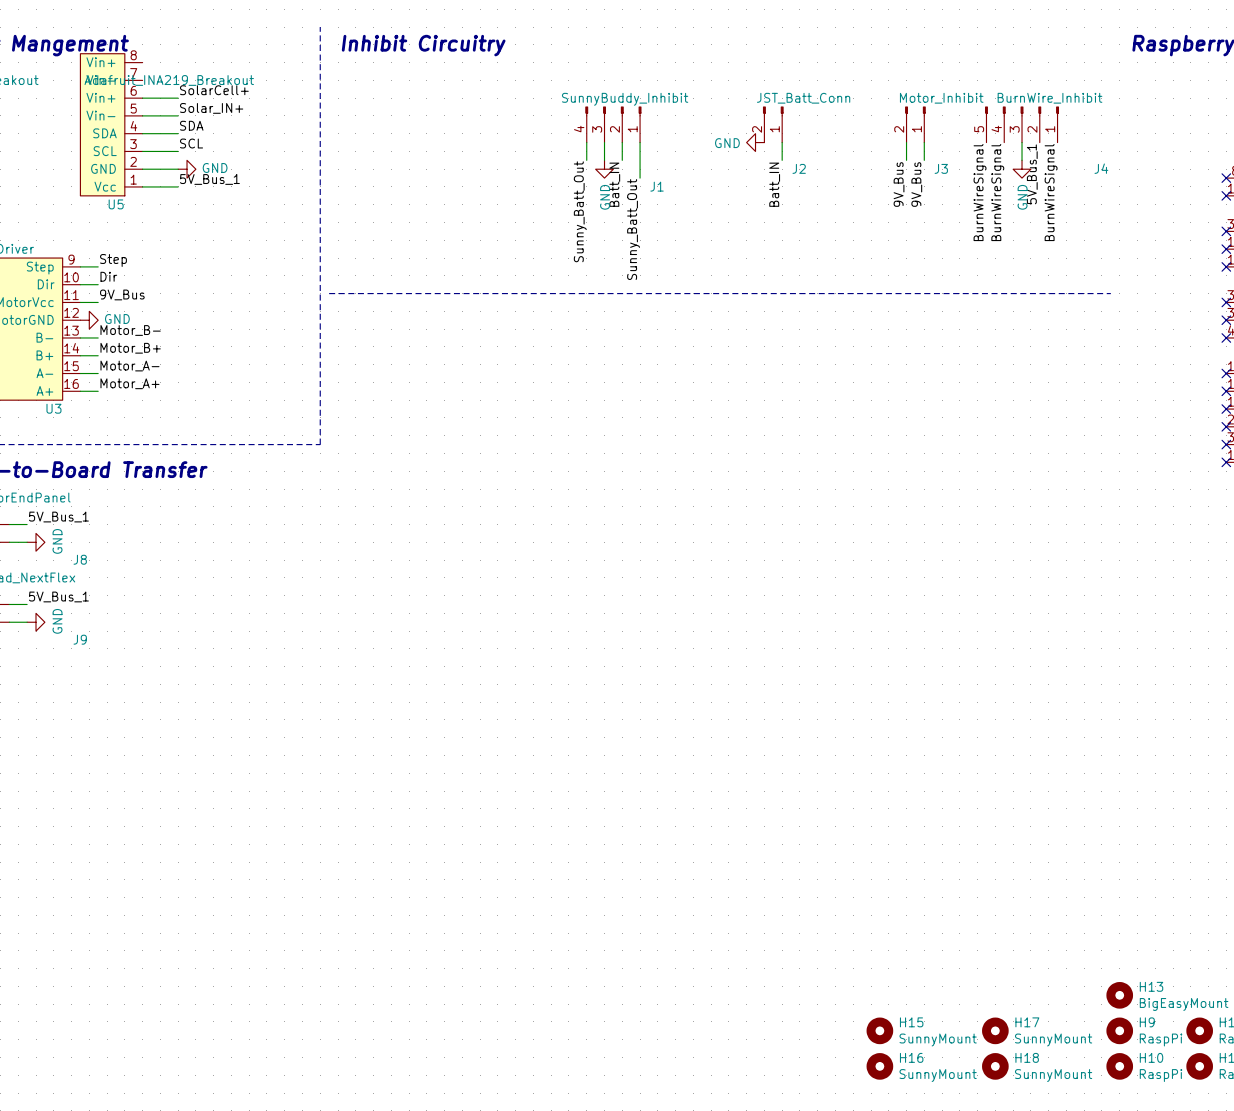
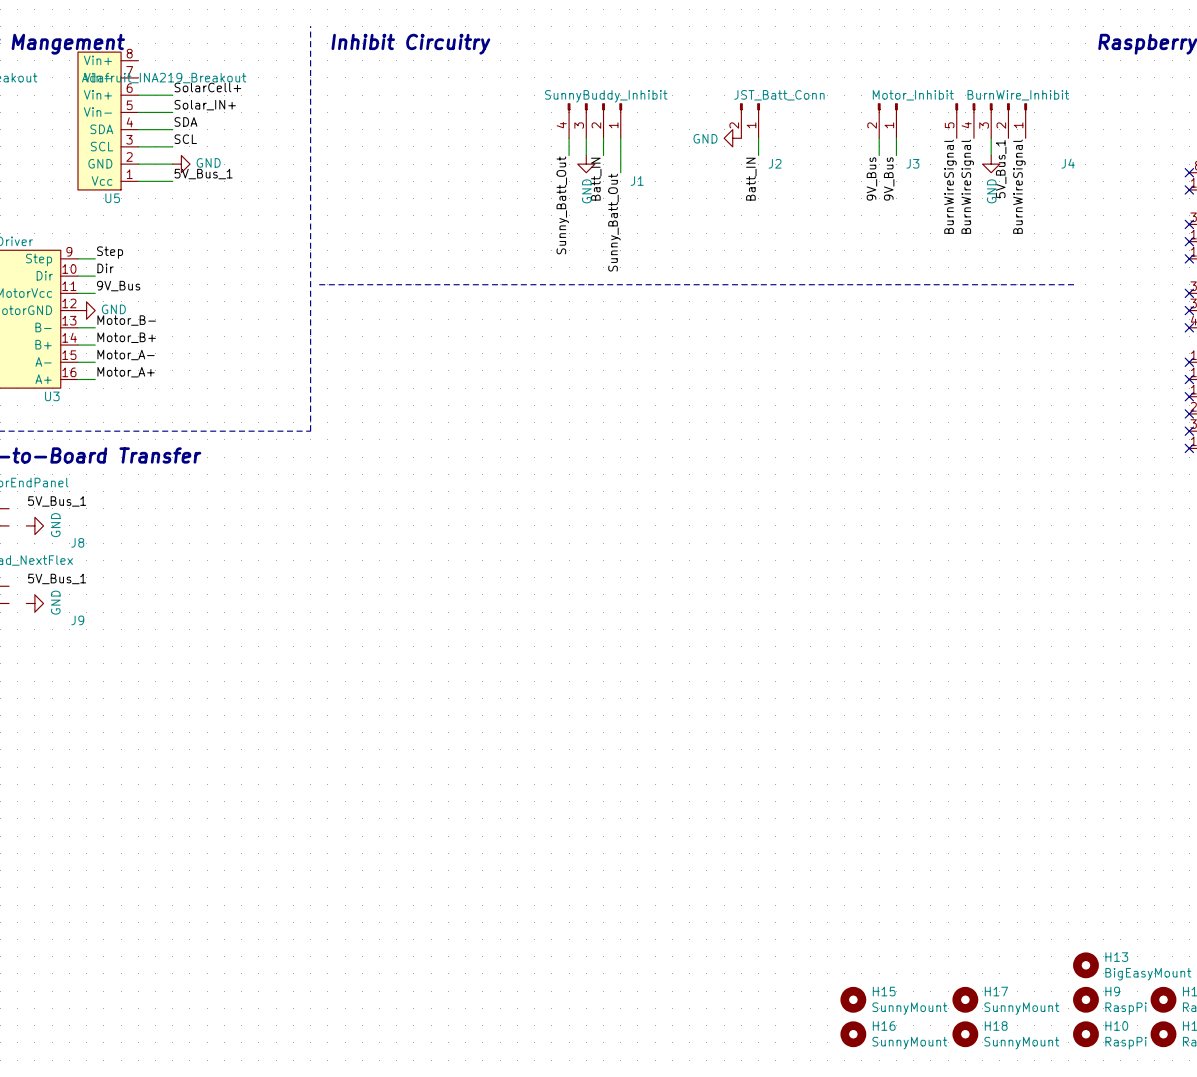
wire: (9, 524) (27, 524) -> none
wire: (9, 542) (27, 542) -> none
wire: (9, 604) (27, 604) -> none
wire: (9, 622) (27, 622) -> none

